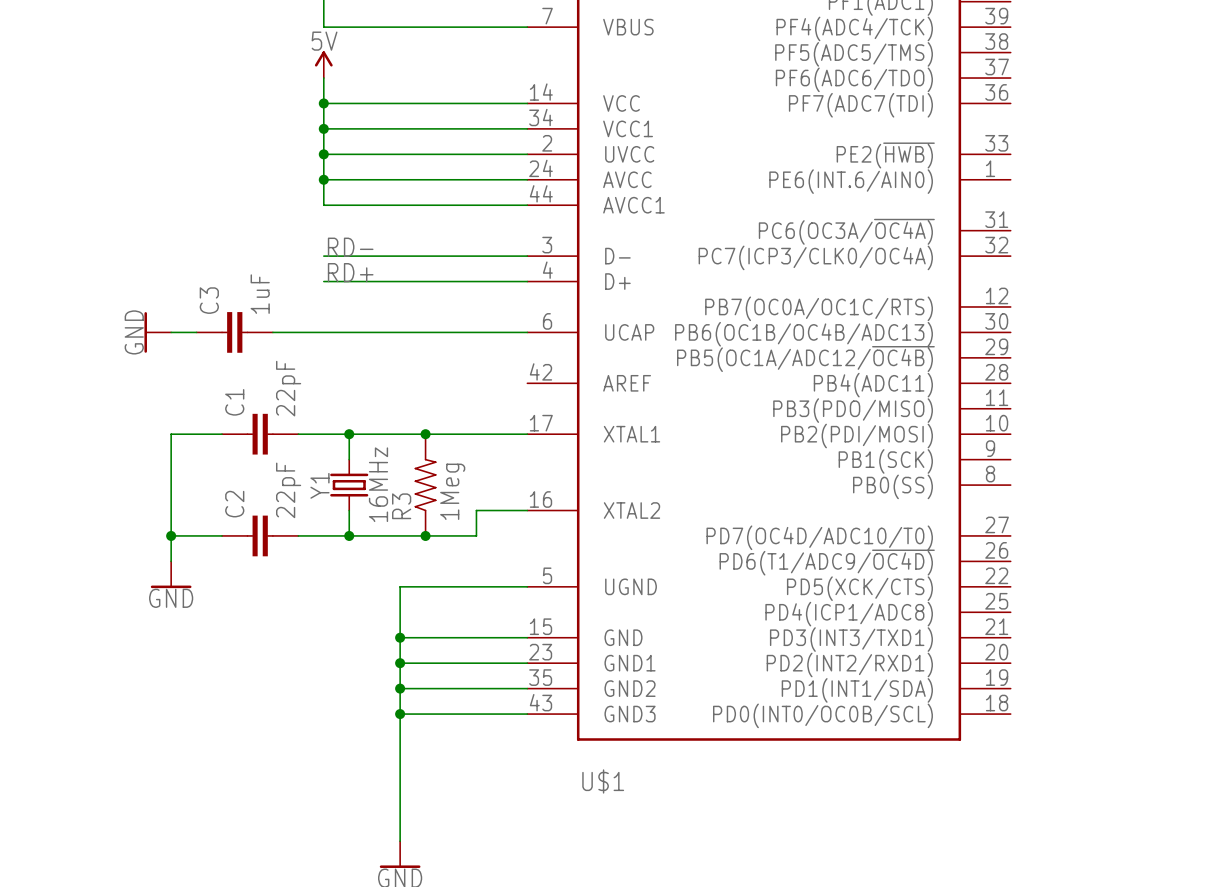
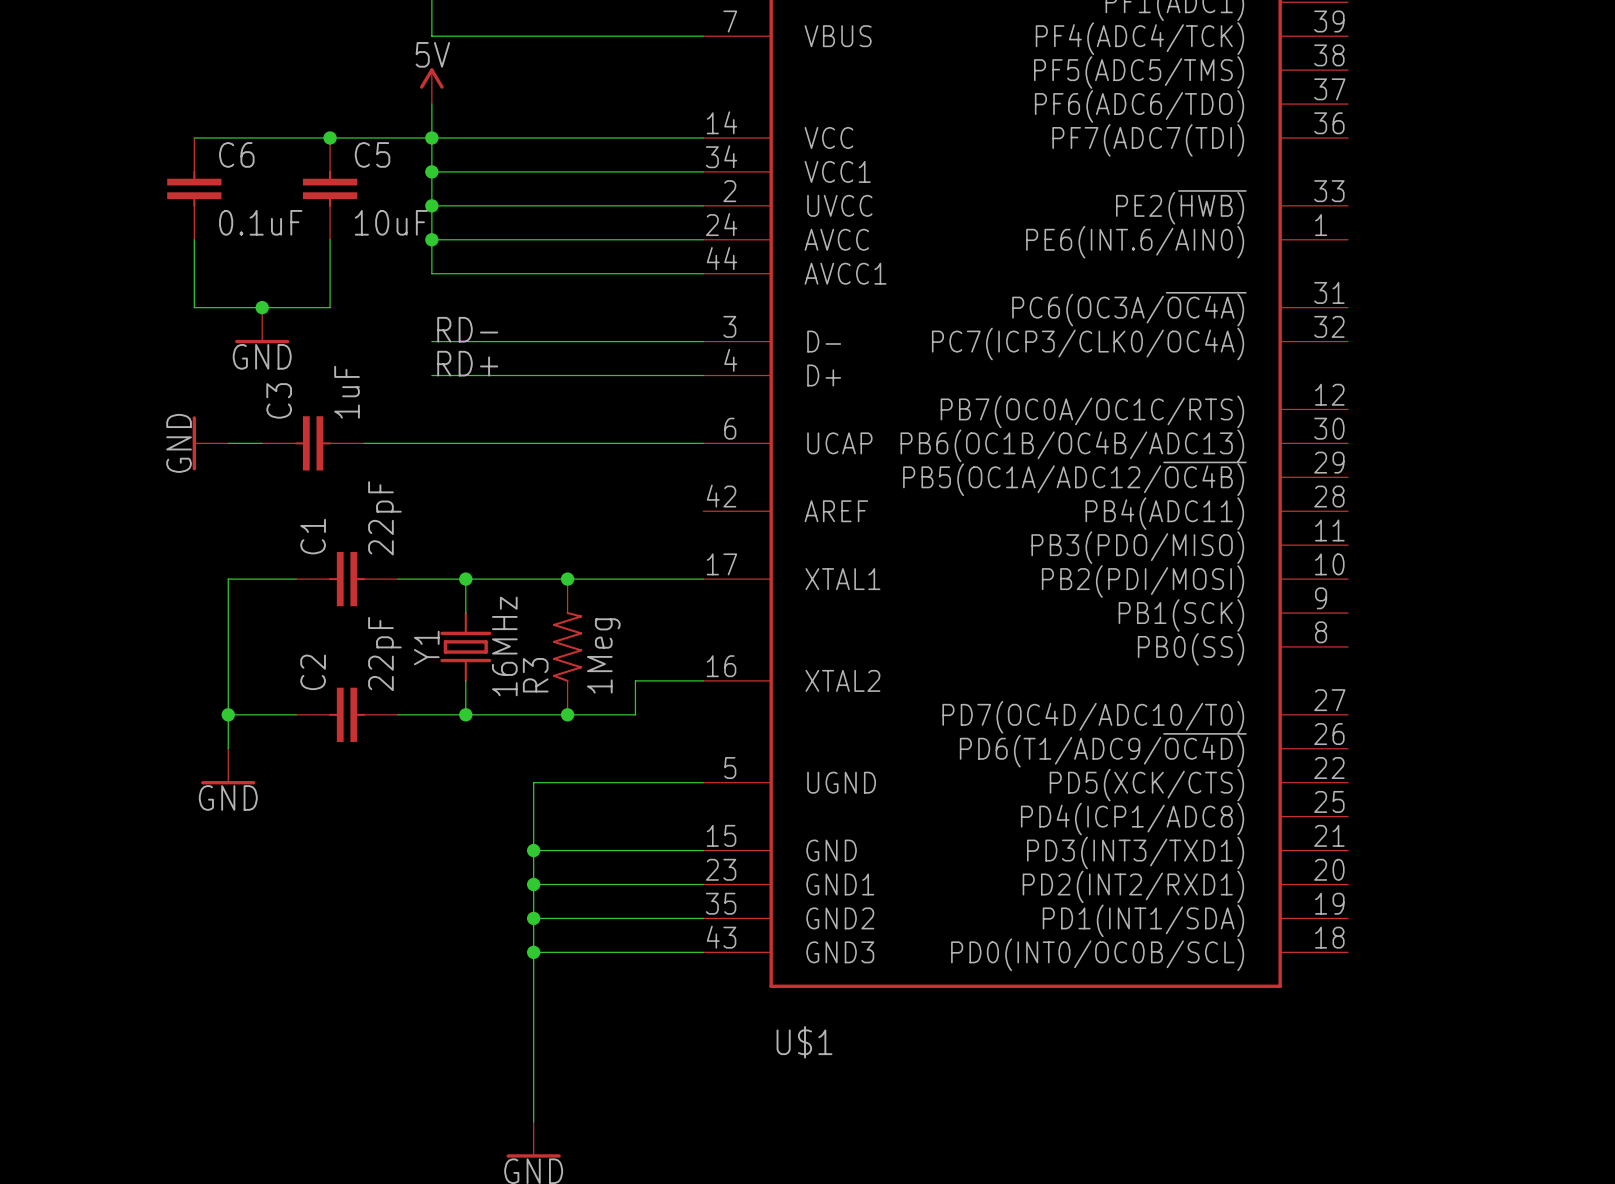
wire: none -> (194, 137) (431, 137)
junction: none -> (330, 137)
C6: none -> 0.1uF (194, 188)
C5: none -> 10uF (330, 188)
wire: none -> (194, 239) (194, 307) (330, 307) (330, 239)
junction: none -> (262, 307)
power symbol: none -> GND (262, 325)

